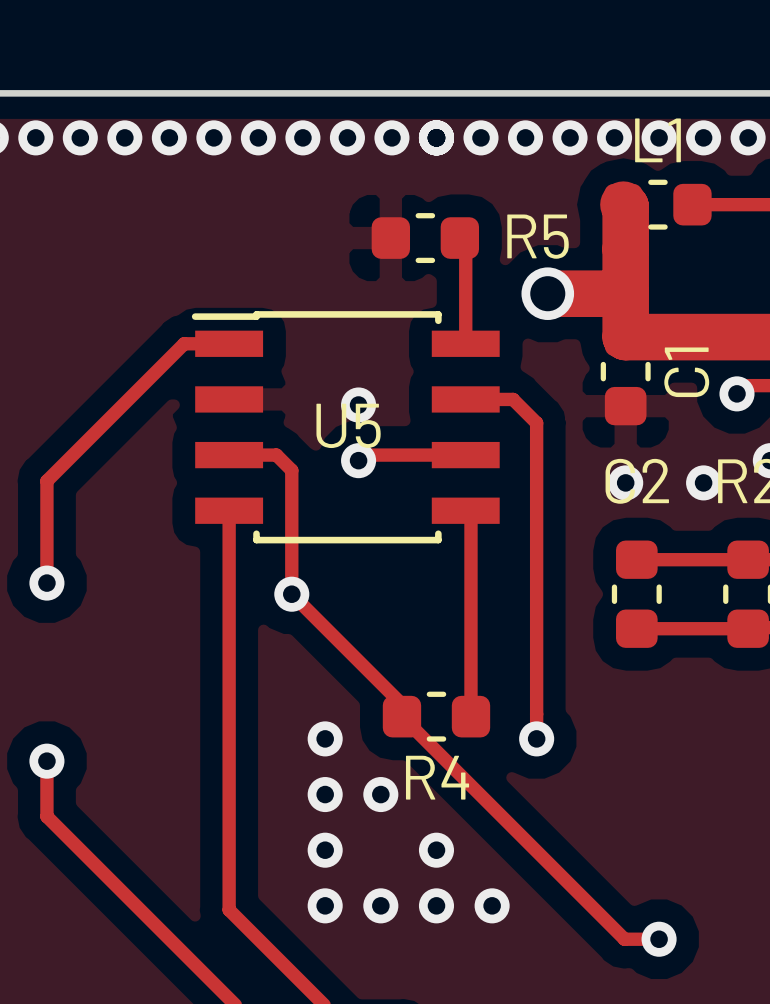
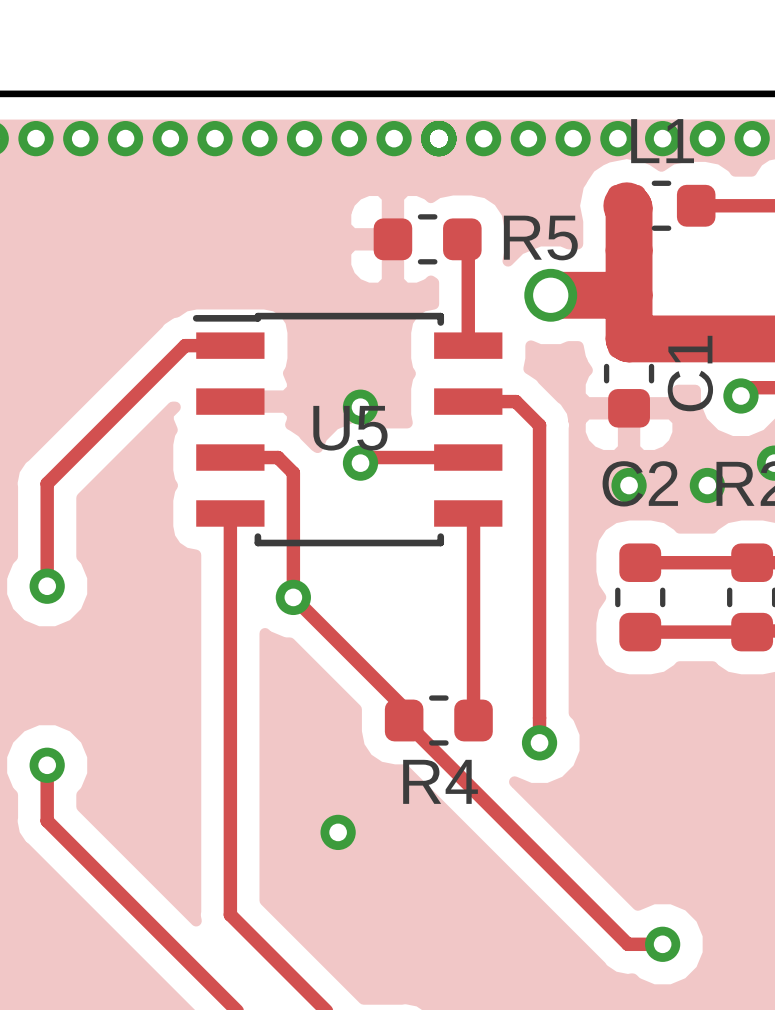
via: (325, 738) -> none
via: (325, 794) -> none
via: (380, 794) -> none
via: none -> (338, 832)
via: (325, 850) -> none
via: (436, 850) -> none
via: (325, 905) -> none
via: (380, 905) -> none
via: (436, 905) -> none
via: (492, 905) -> none

